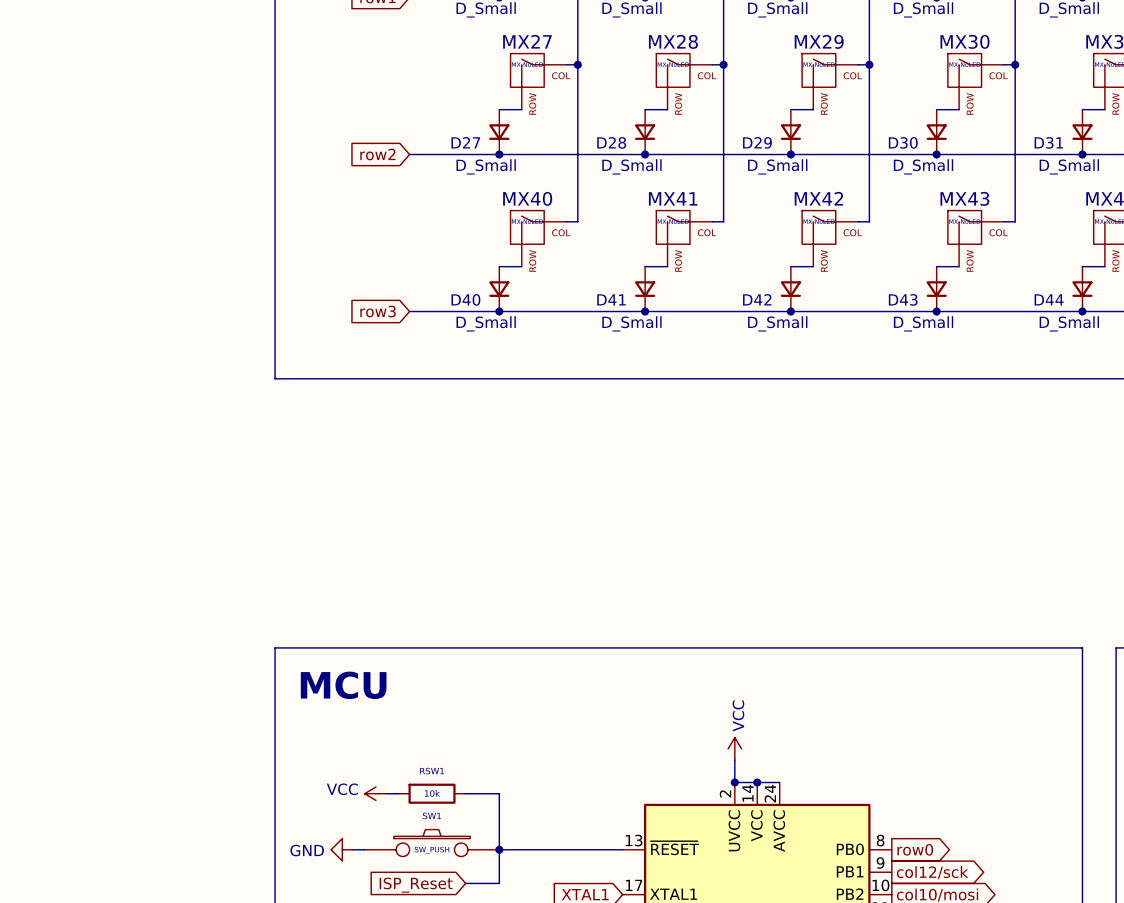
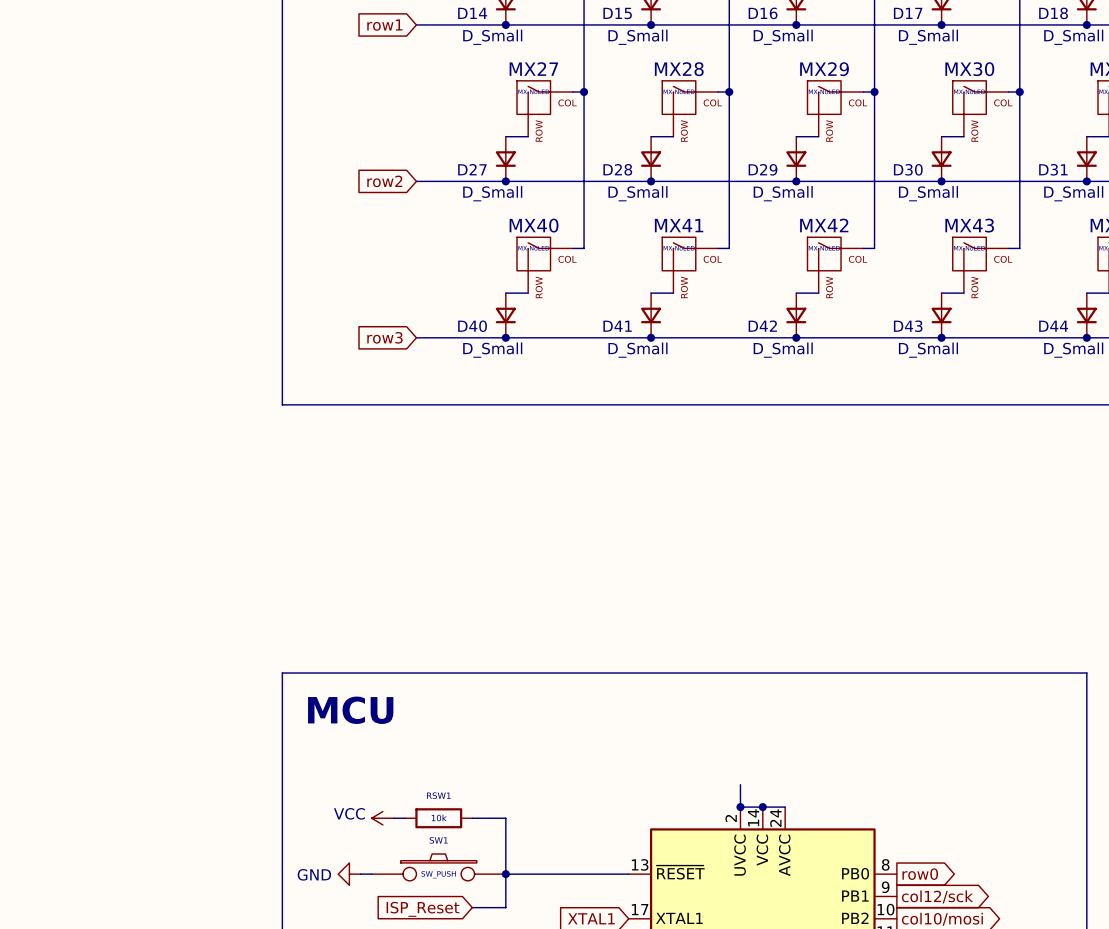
power symbol: VCC (734, 748) -> none

